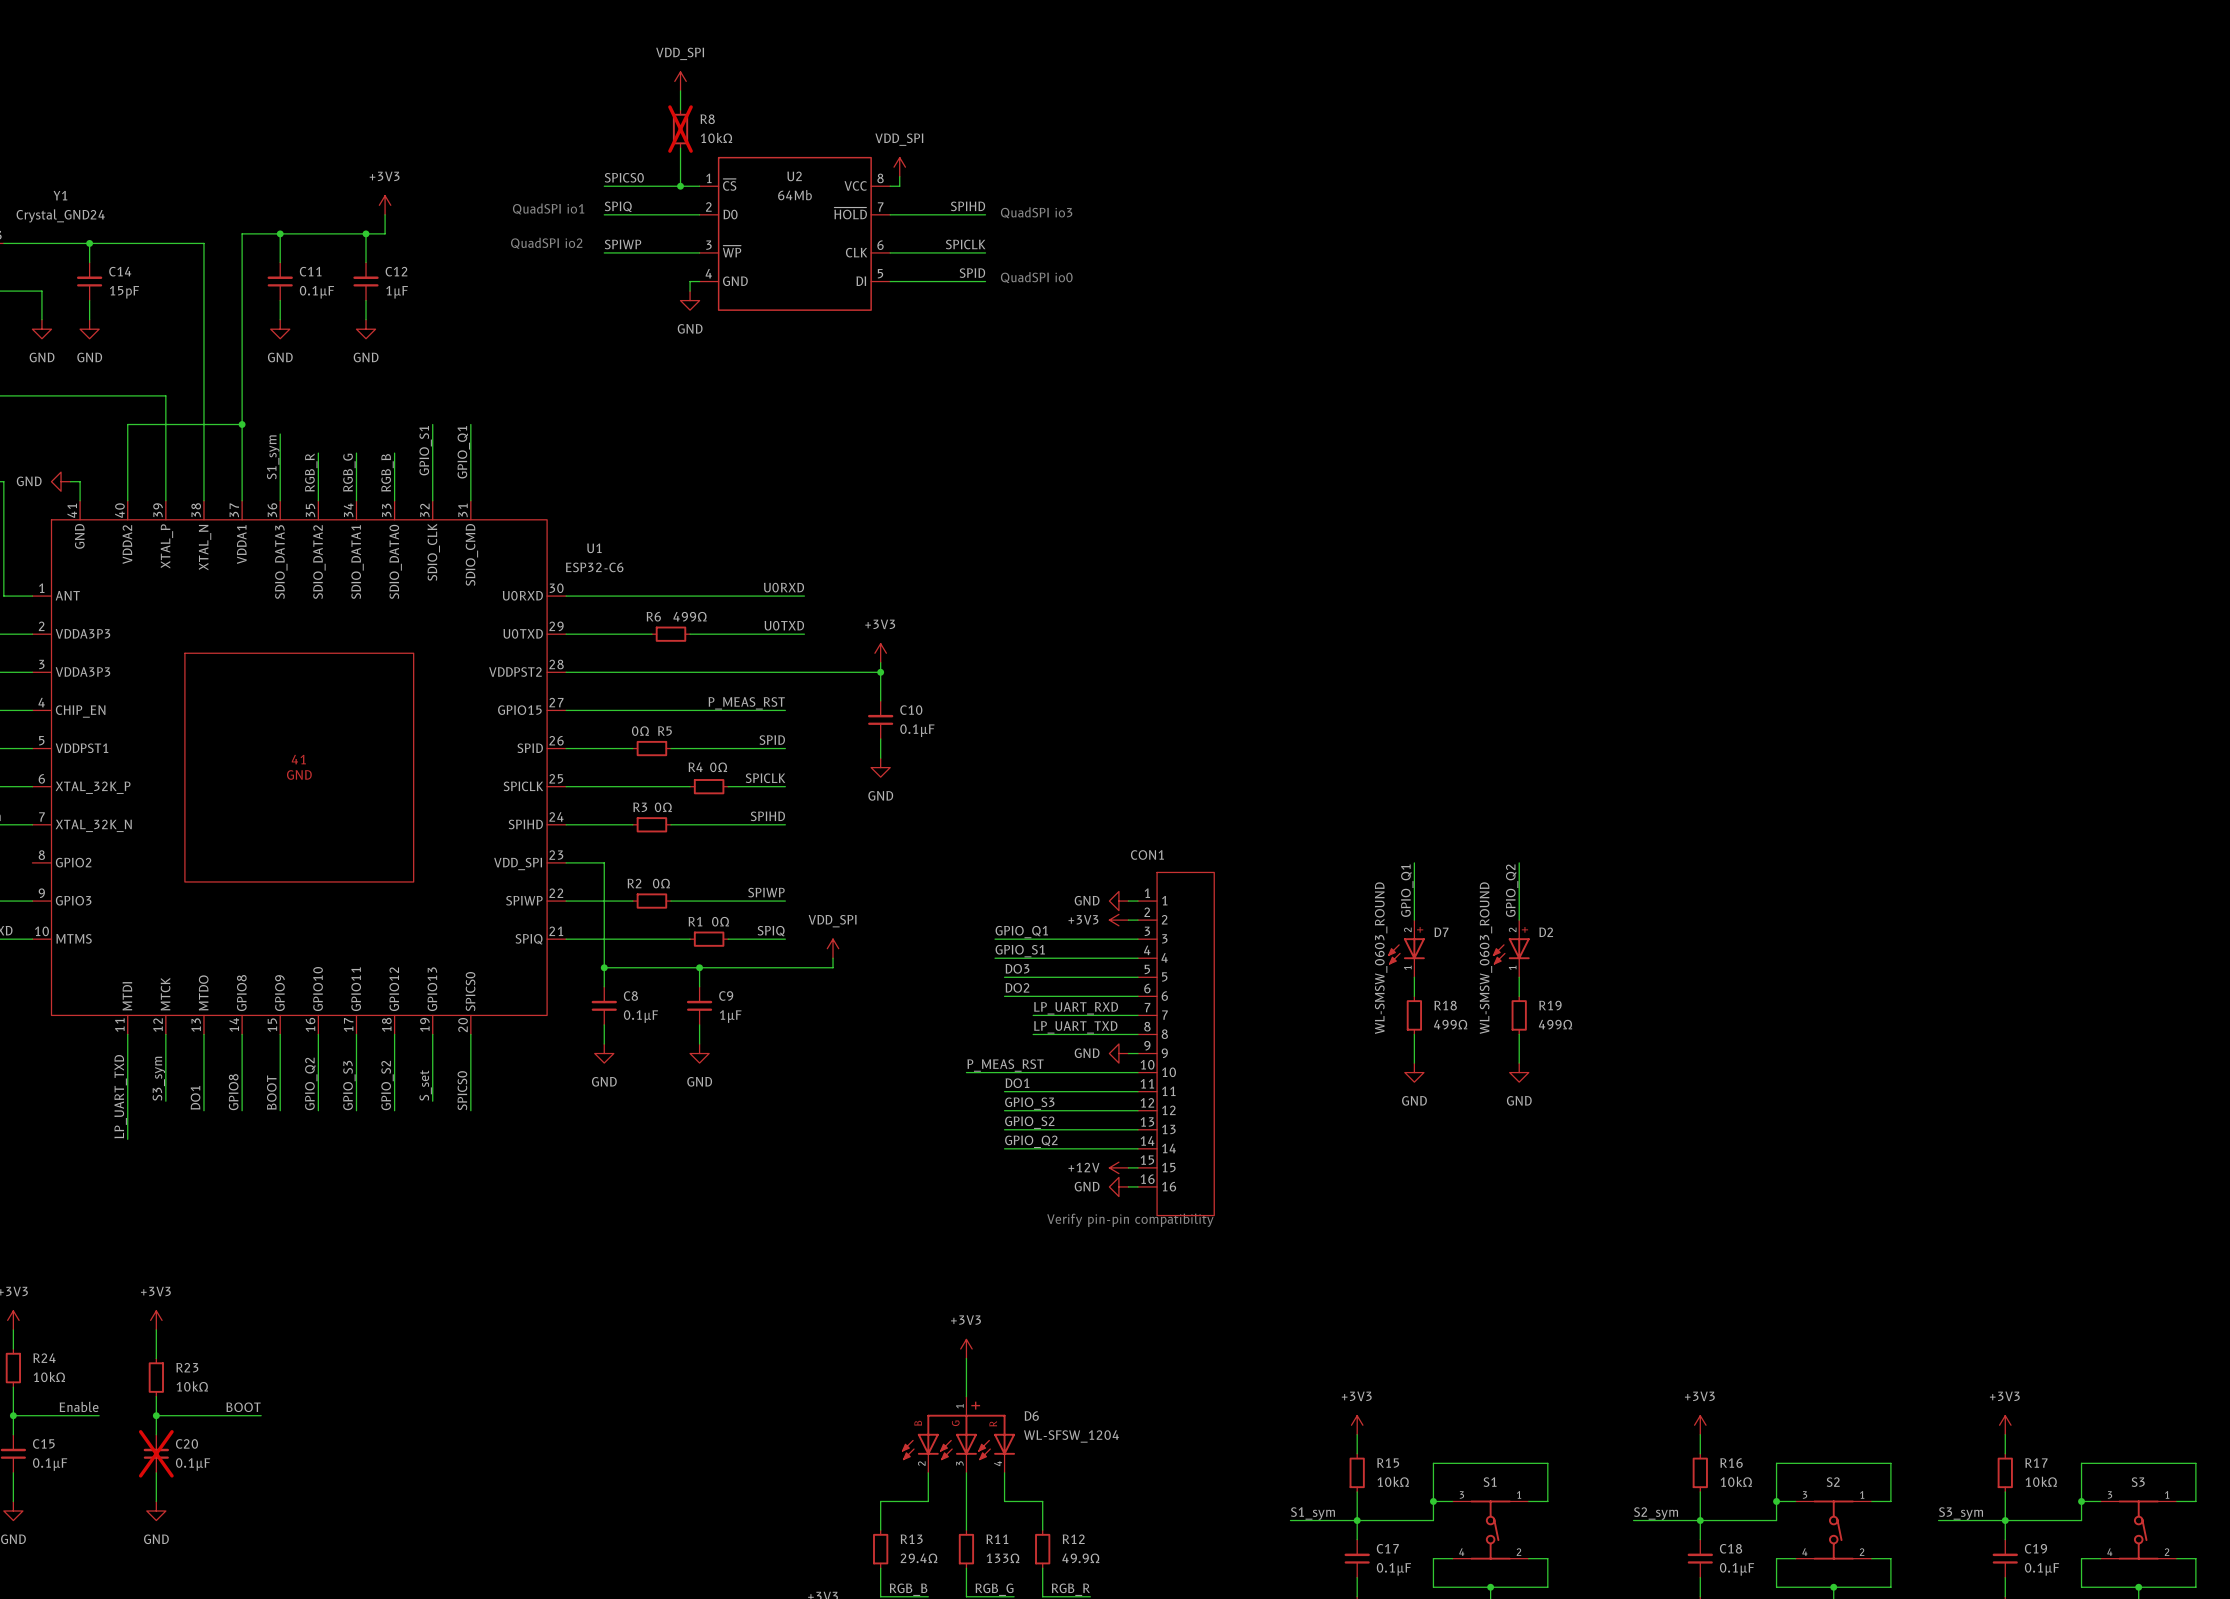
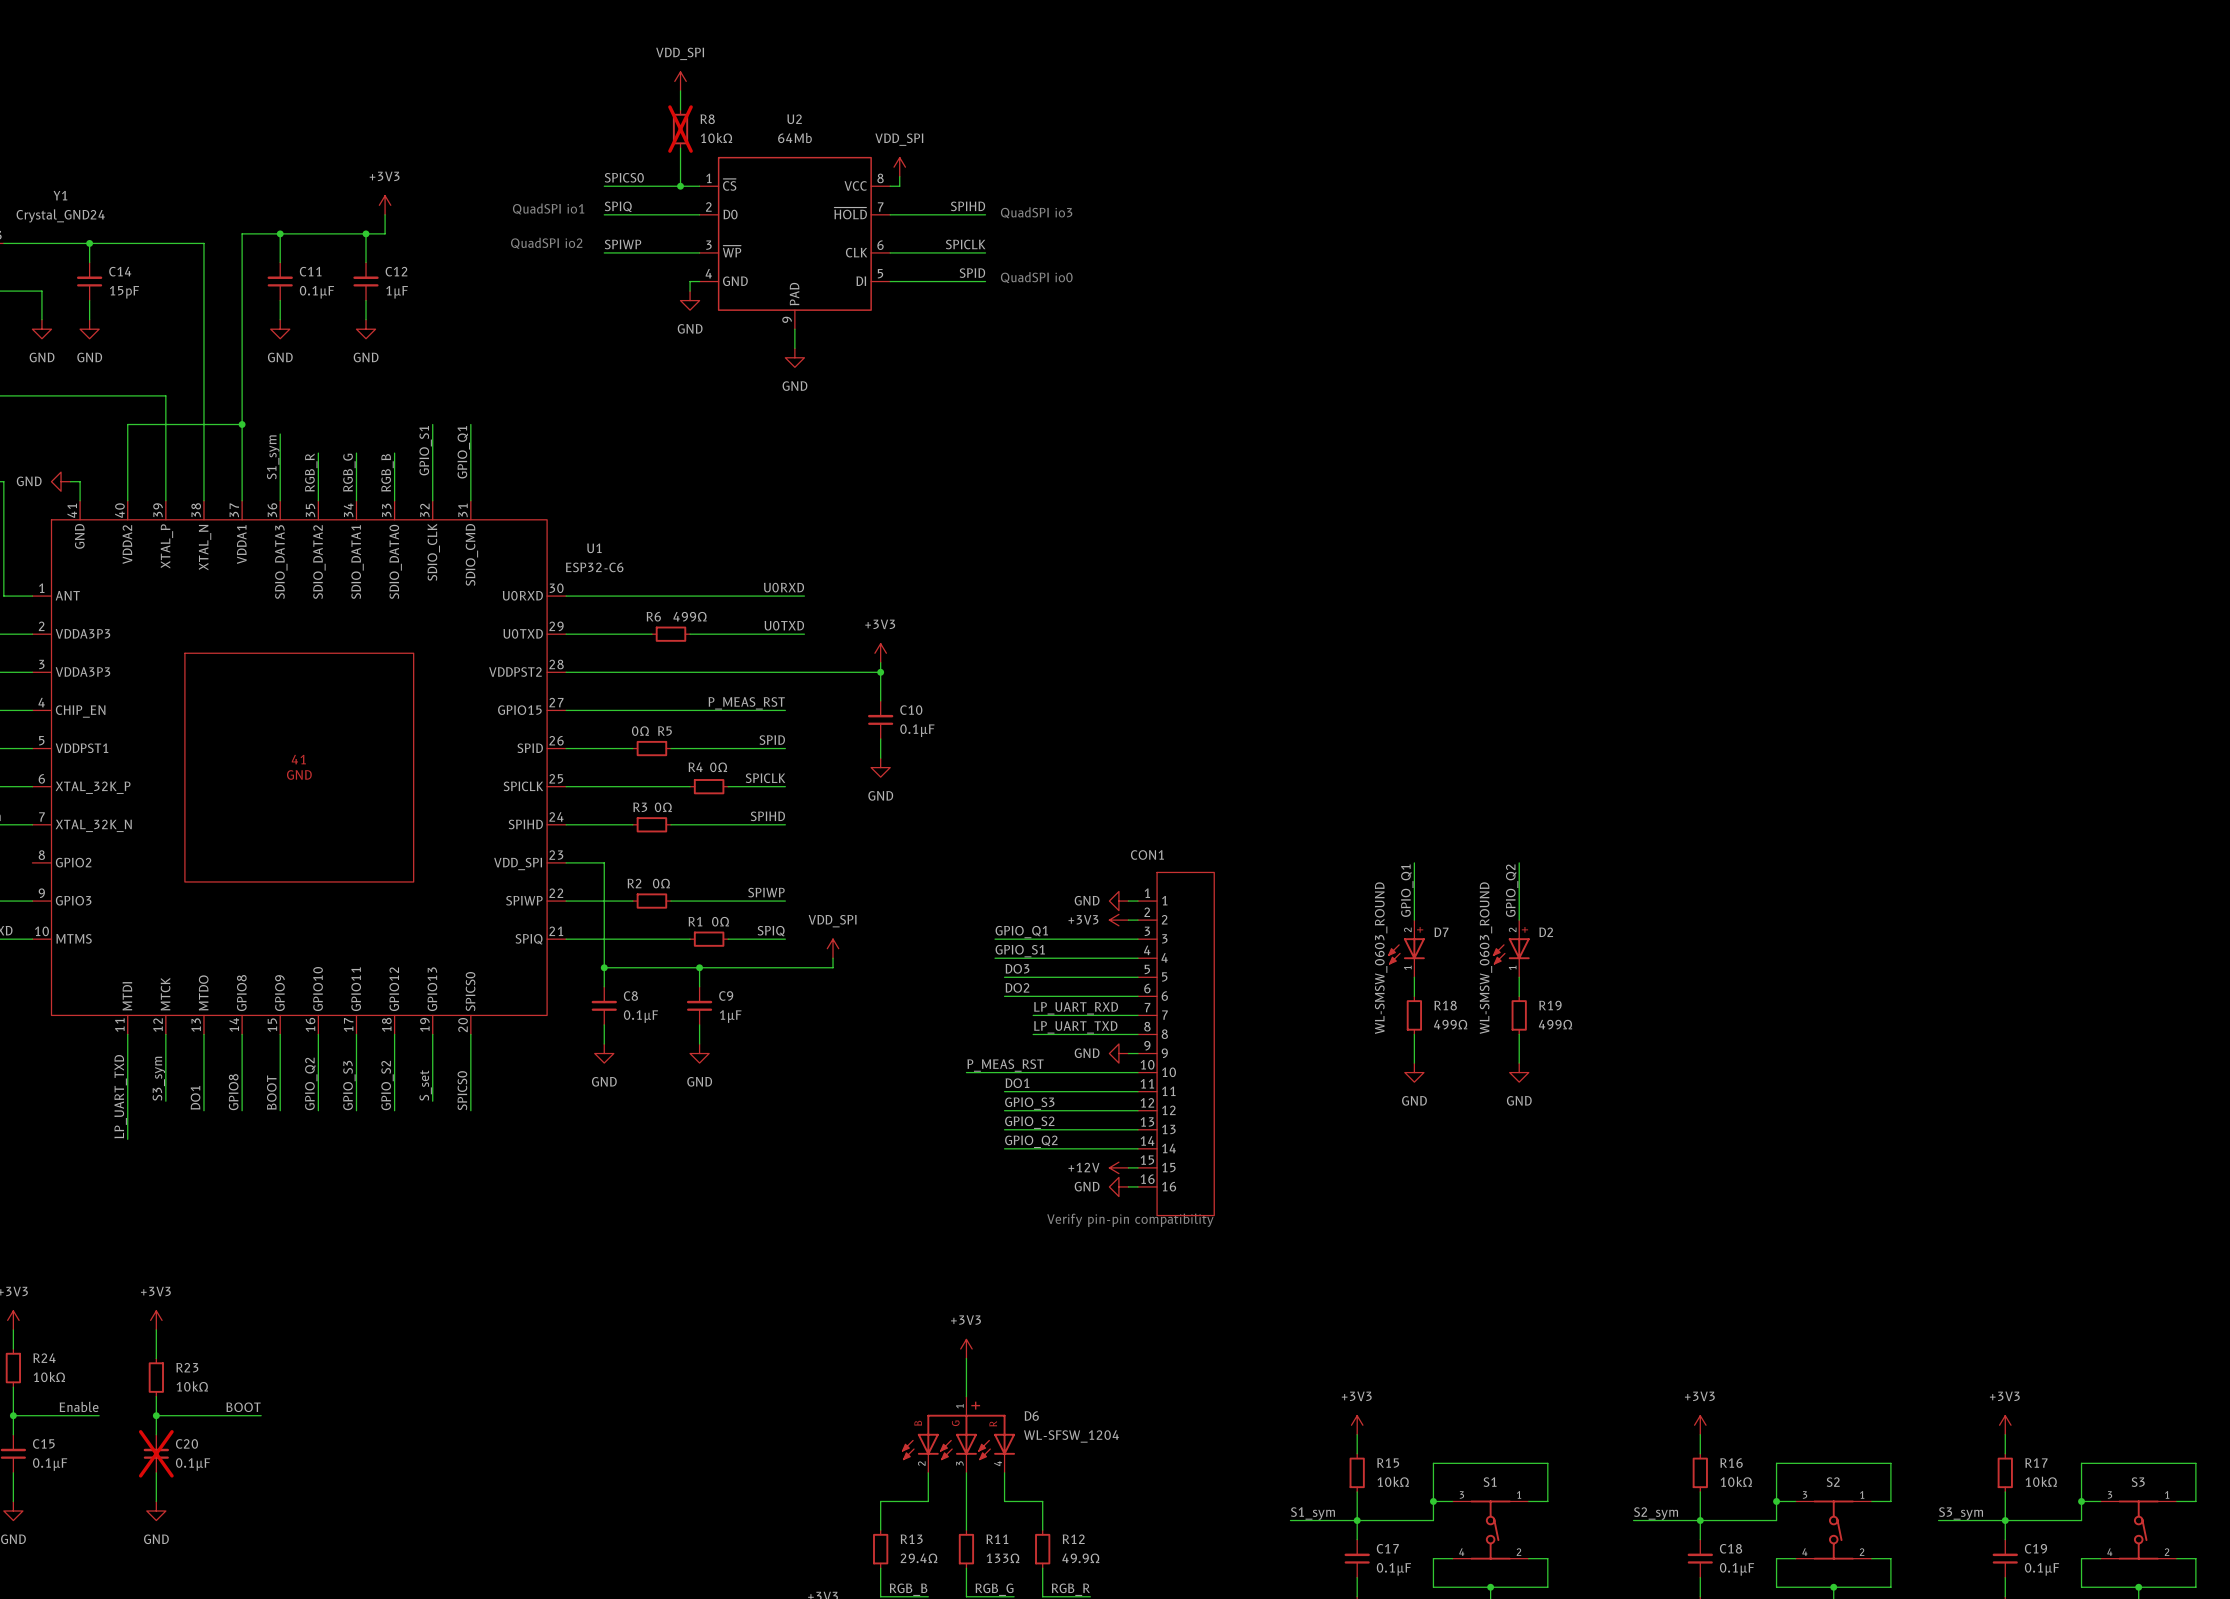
U2 symbol: [699, 156, 891, 311] -> [699, 156, 891, 330]
U2 name position: U2 (794, 176) -> U2 (794, 119)
U2 text position: 64Mb (794, 195) -> 64Mb (794, 137)
wire: none -> (794, 329) (794, 348)
power symbol: none -> GND (794, 357)

